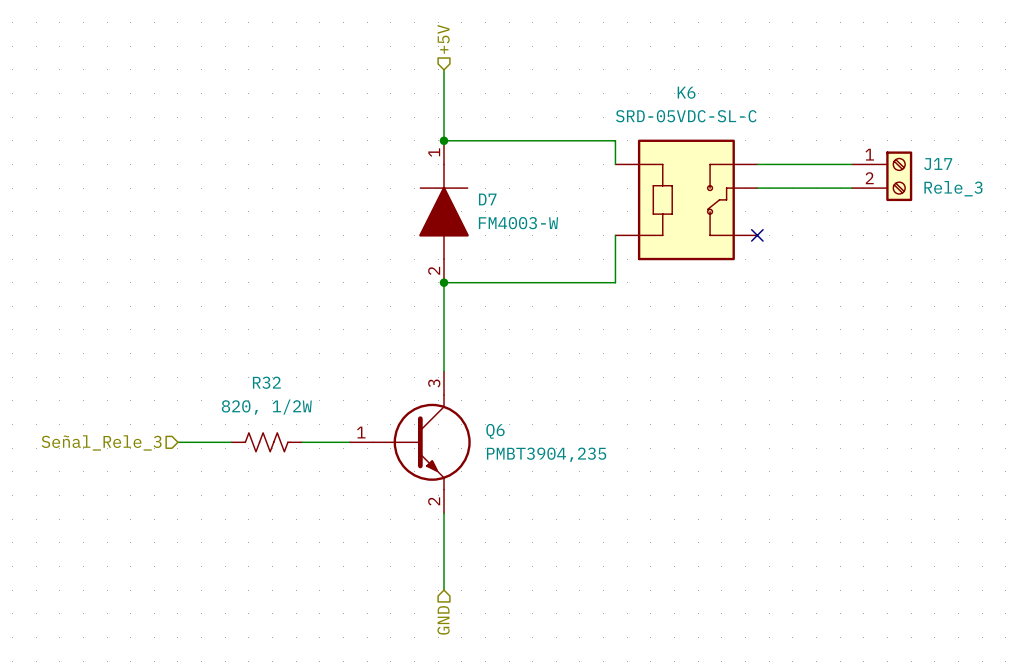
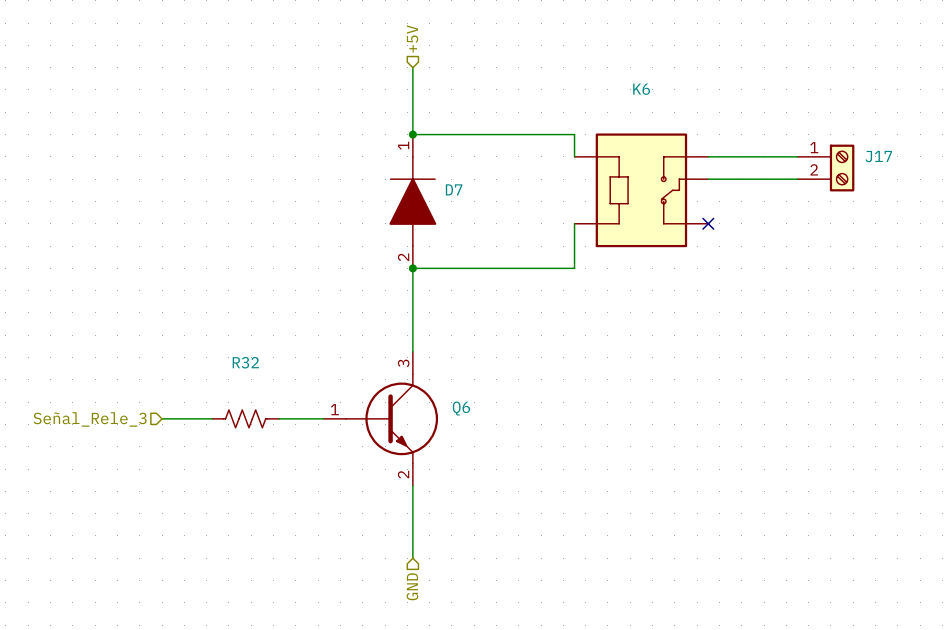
K6 value: SRD-05VDC-SL-C (686, 116) -> none
J17 value: Rele_3 (953, 188) -> none
D7 value: FM4003-W (518, 223) -> none
R32 value: 820, 1/2W (266, 407) -> none
Q6 value: PMBT3904,235 (546, 454) -> none

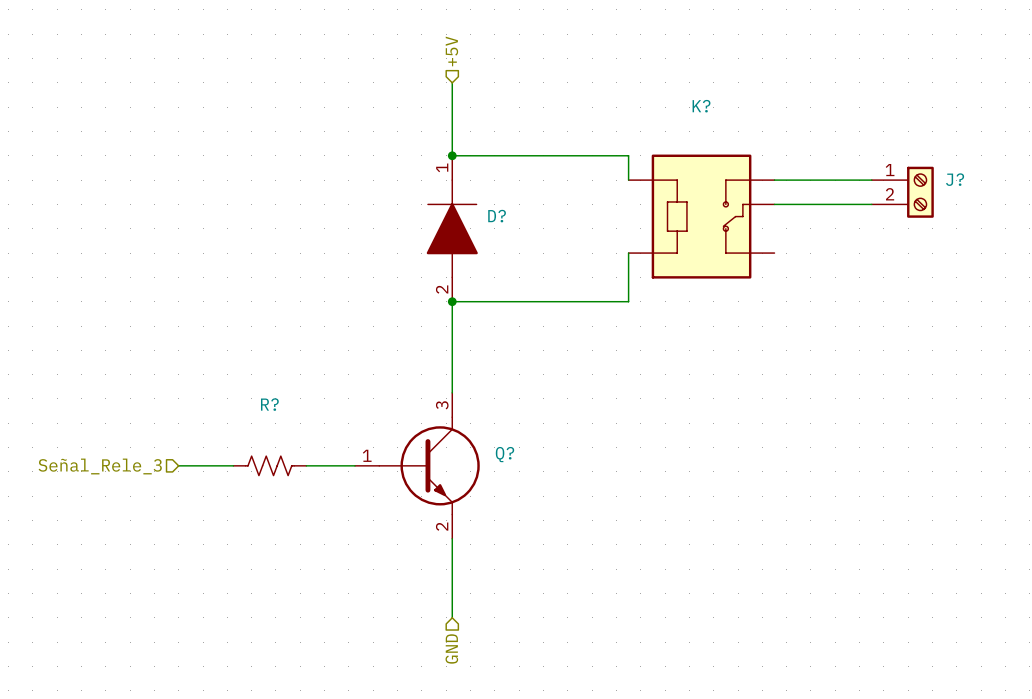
K6 name: K6 (641, 89) -> K? (701, 106)
J17 name: J17 (878, 156) -> J? (955, 179)
D7 name: D7 (454, 189) -> D? (497, 216)
no-connect mark: (708, 223) -> none
R32 name: R32 (245, 362) -> R? (269, 404)
Q6 name: Q6 (461, 408) -> Q? (504, 454)

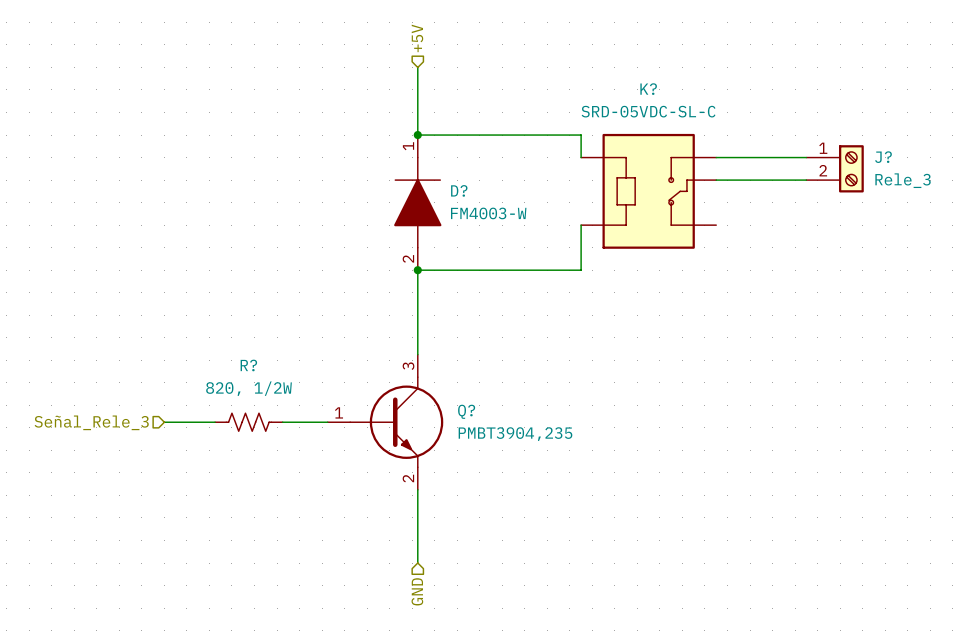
K? value: none -> SRD-05VDC-SL-C (648, 111)
J? value: none -> Rele_3 (903, 180)
D? value: none -> FM4003-W (488, 213)
R? value: none -> 820, 1/2W (249, 388)
Q? value: none -> PMBT3904,235 (515, 434)

